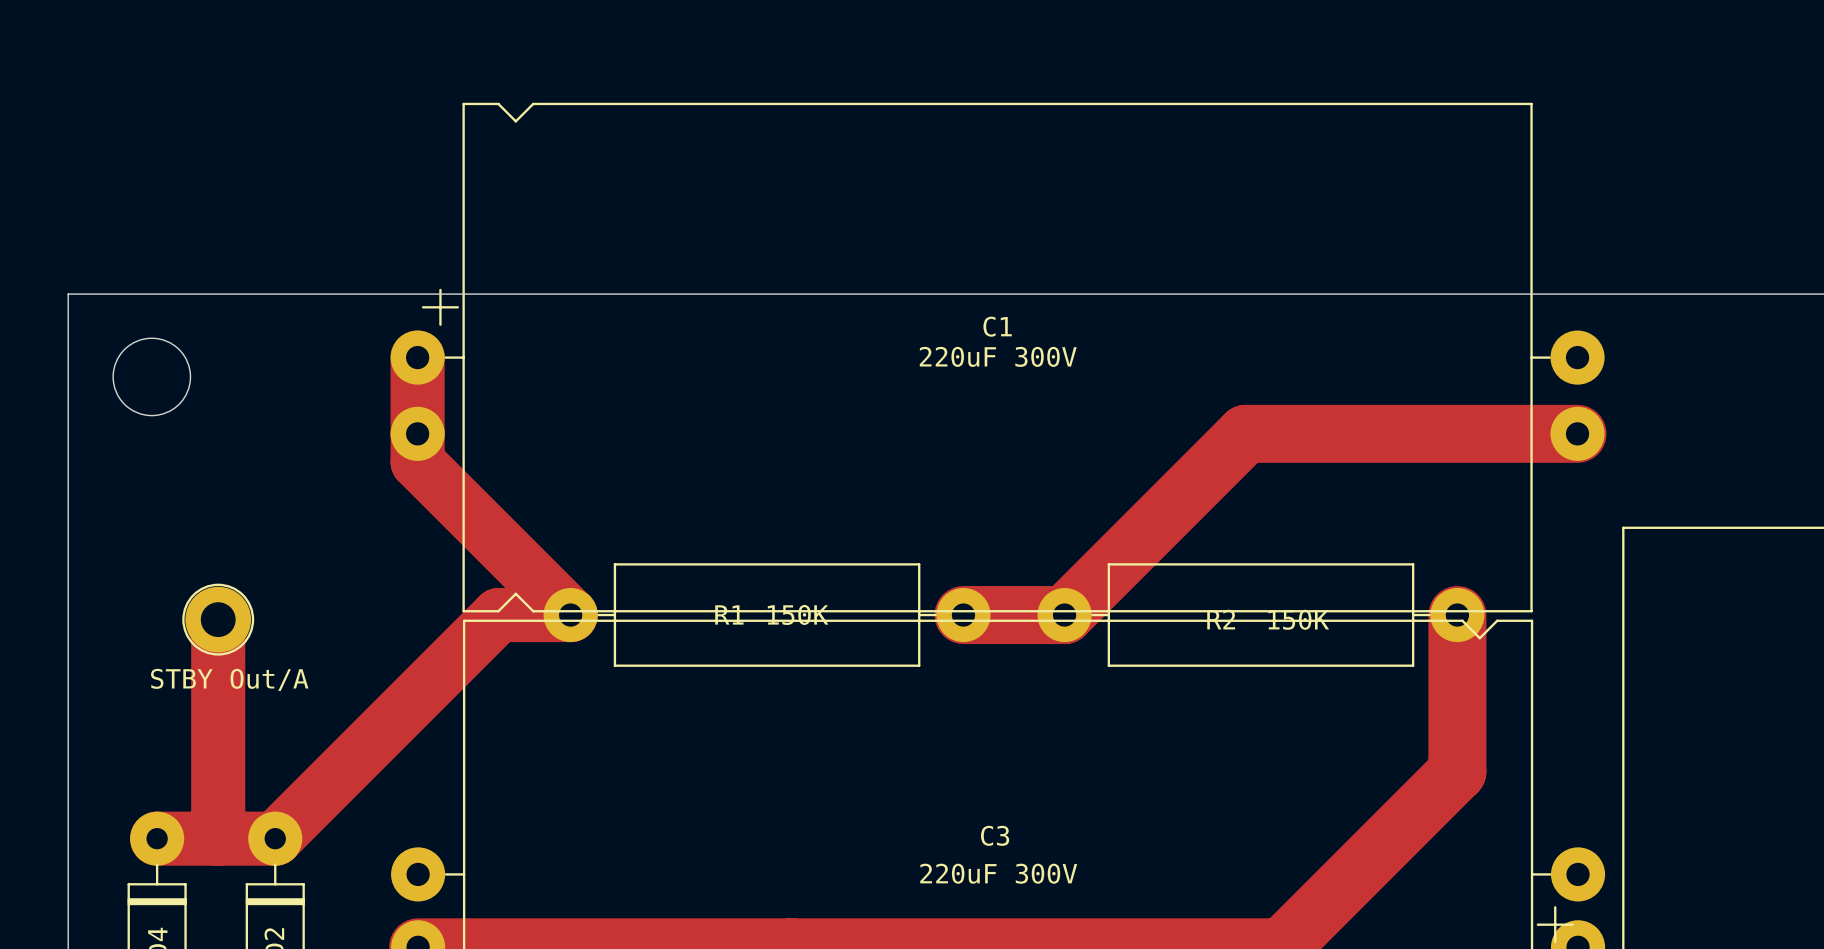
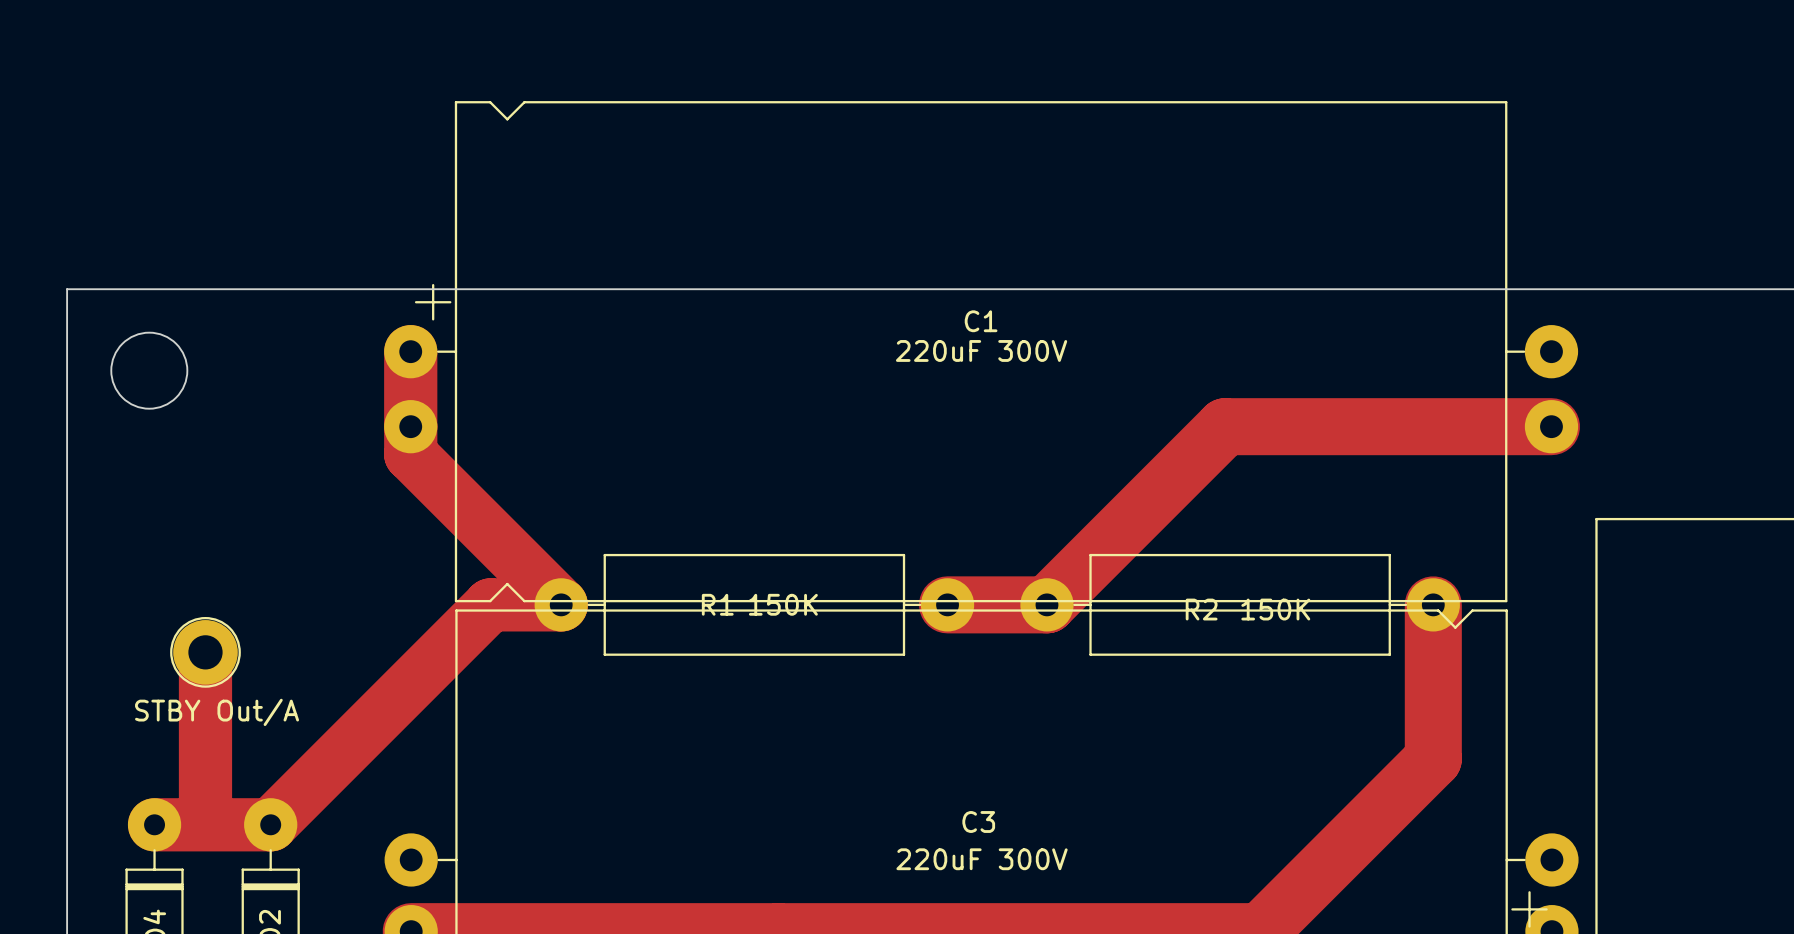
track: (218, 619) (218, 838) -> none
part position: (218, 619) -> (205, 652)
track: none -> (205, 652) (205, 823)

